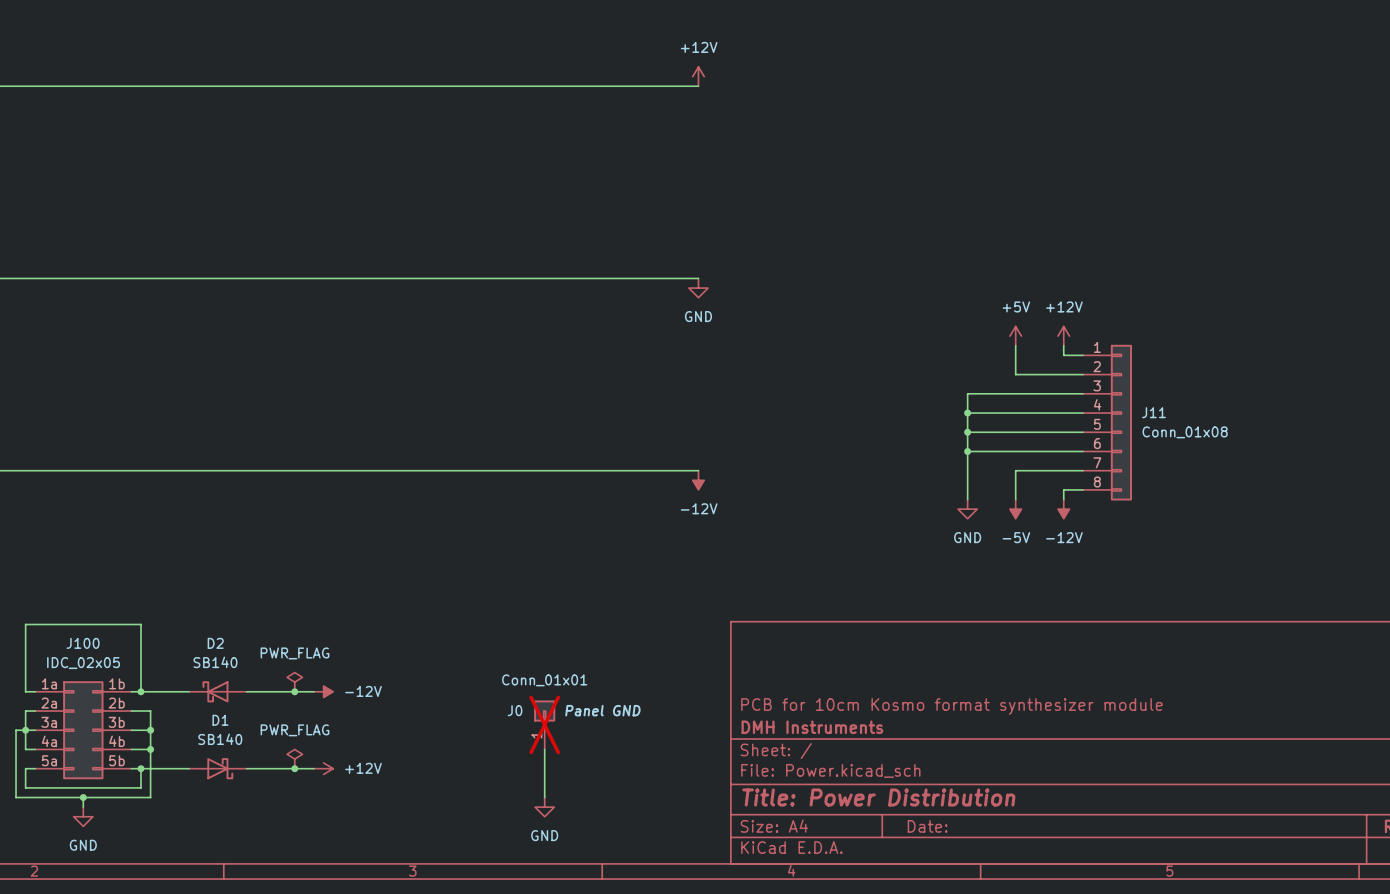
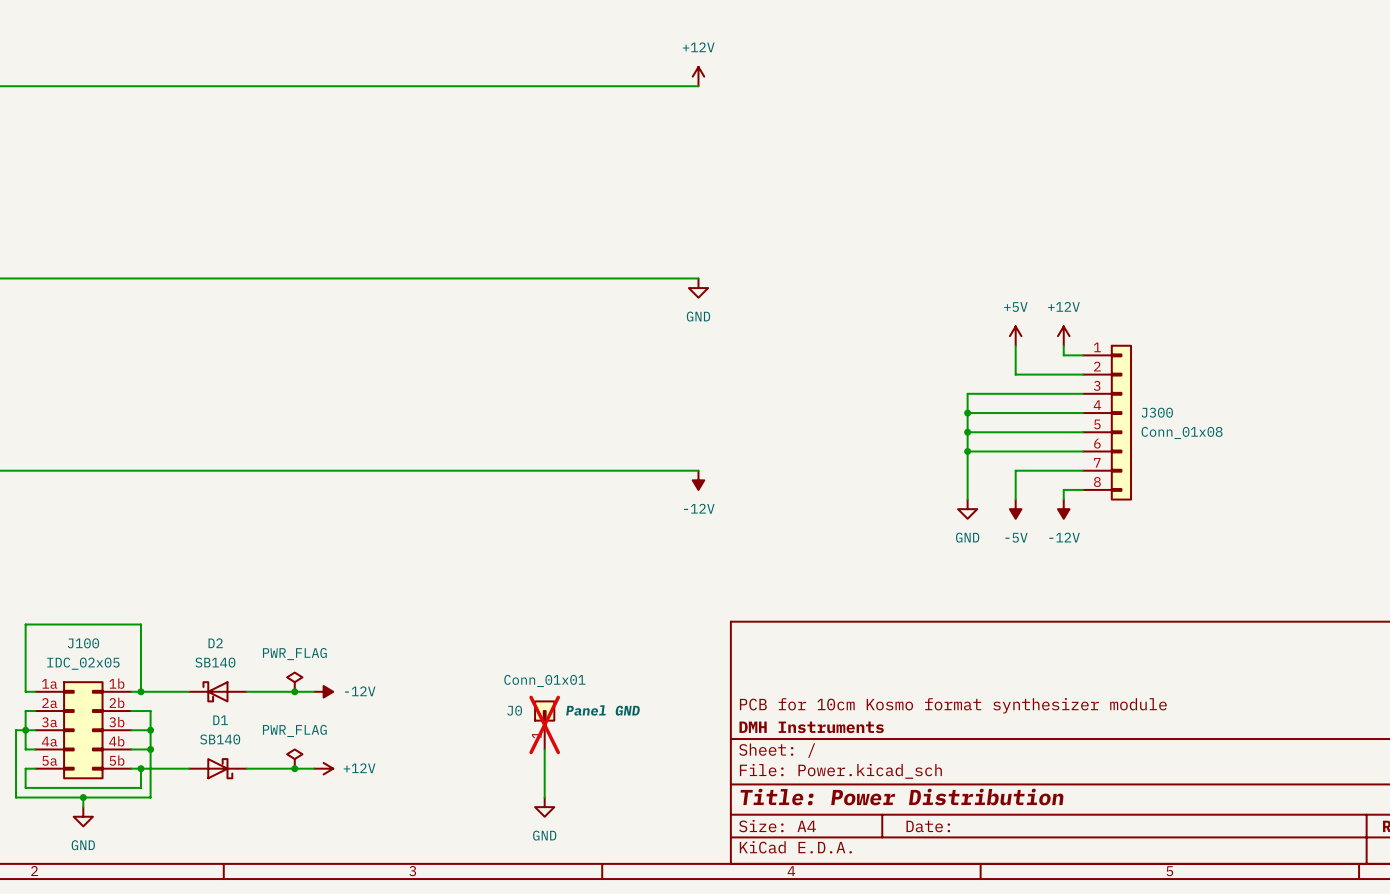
J11 name: J11 (1153, 412) -> J300 (1157, 412)

